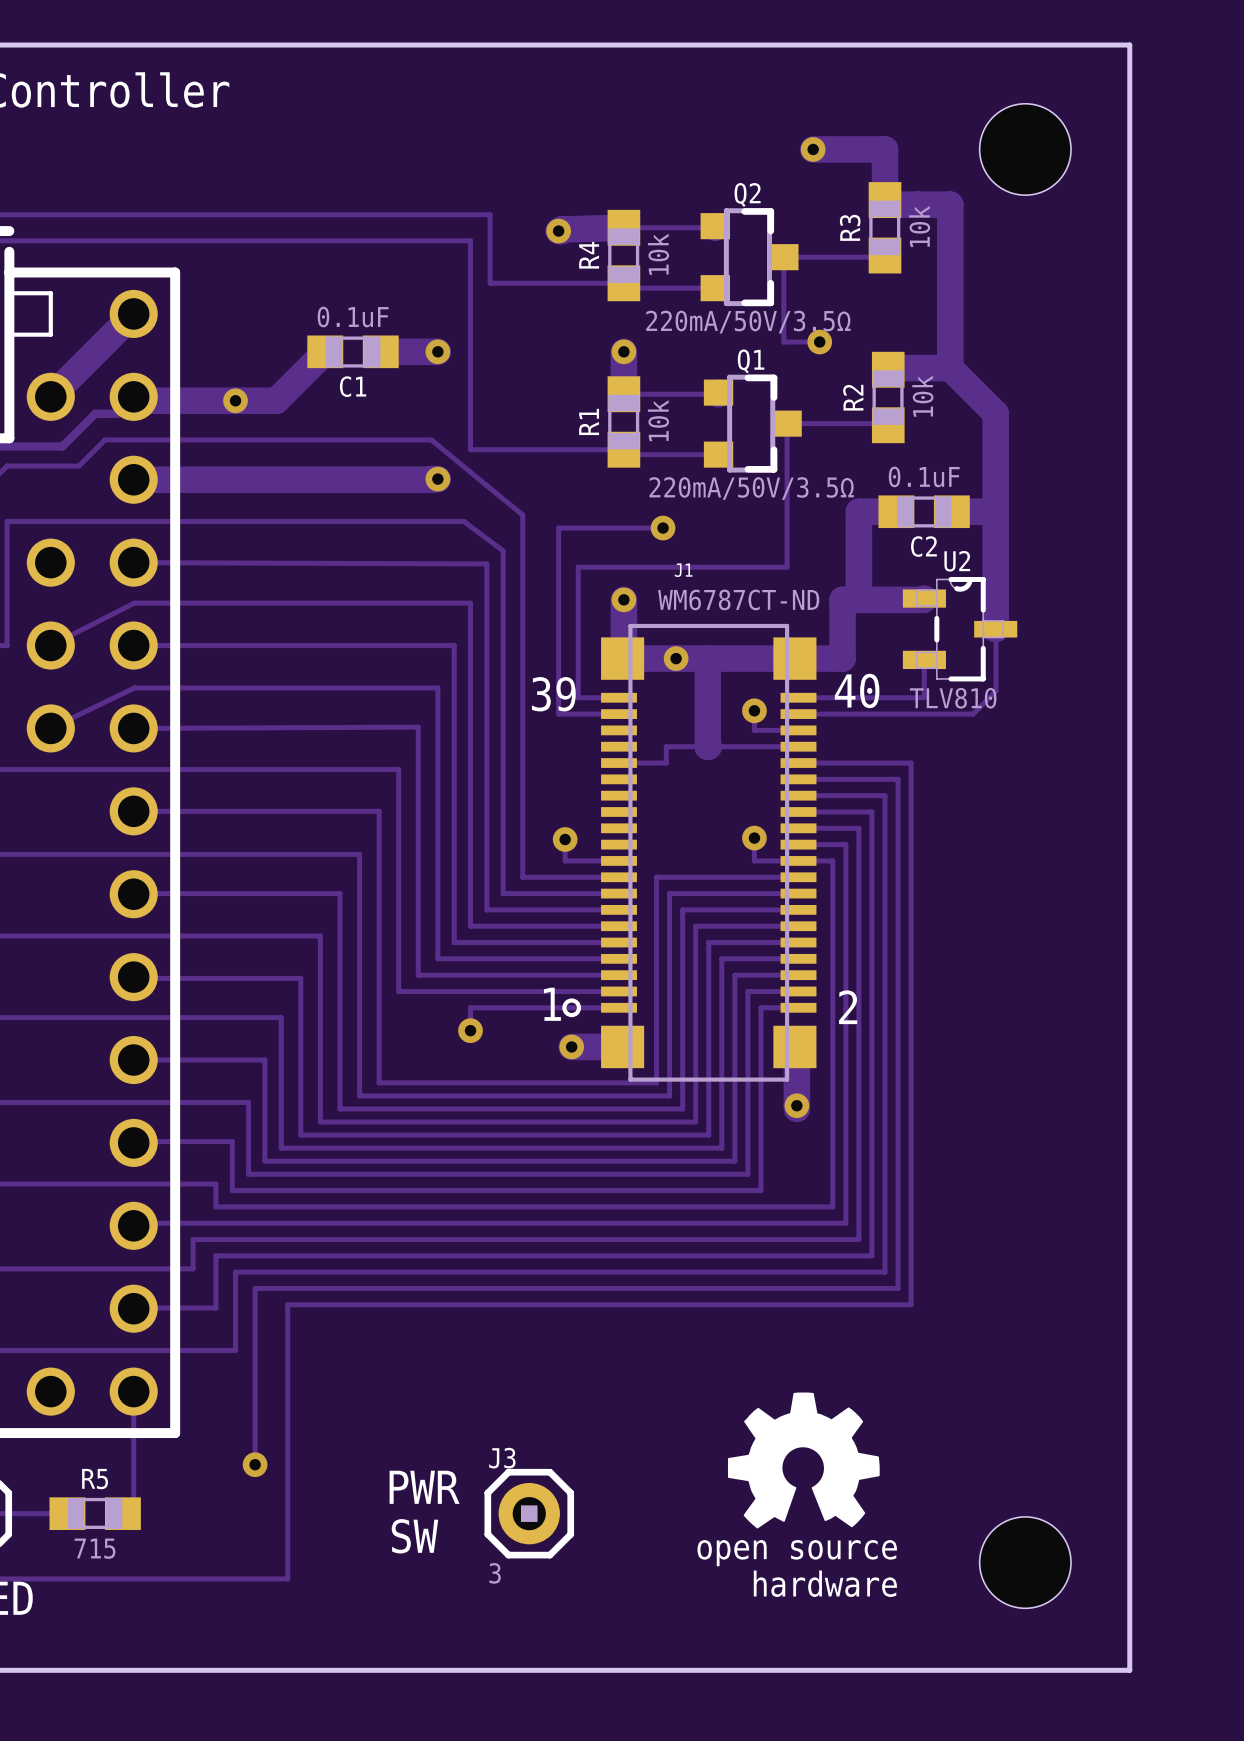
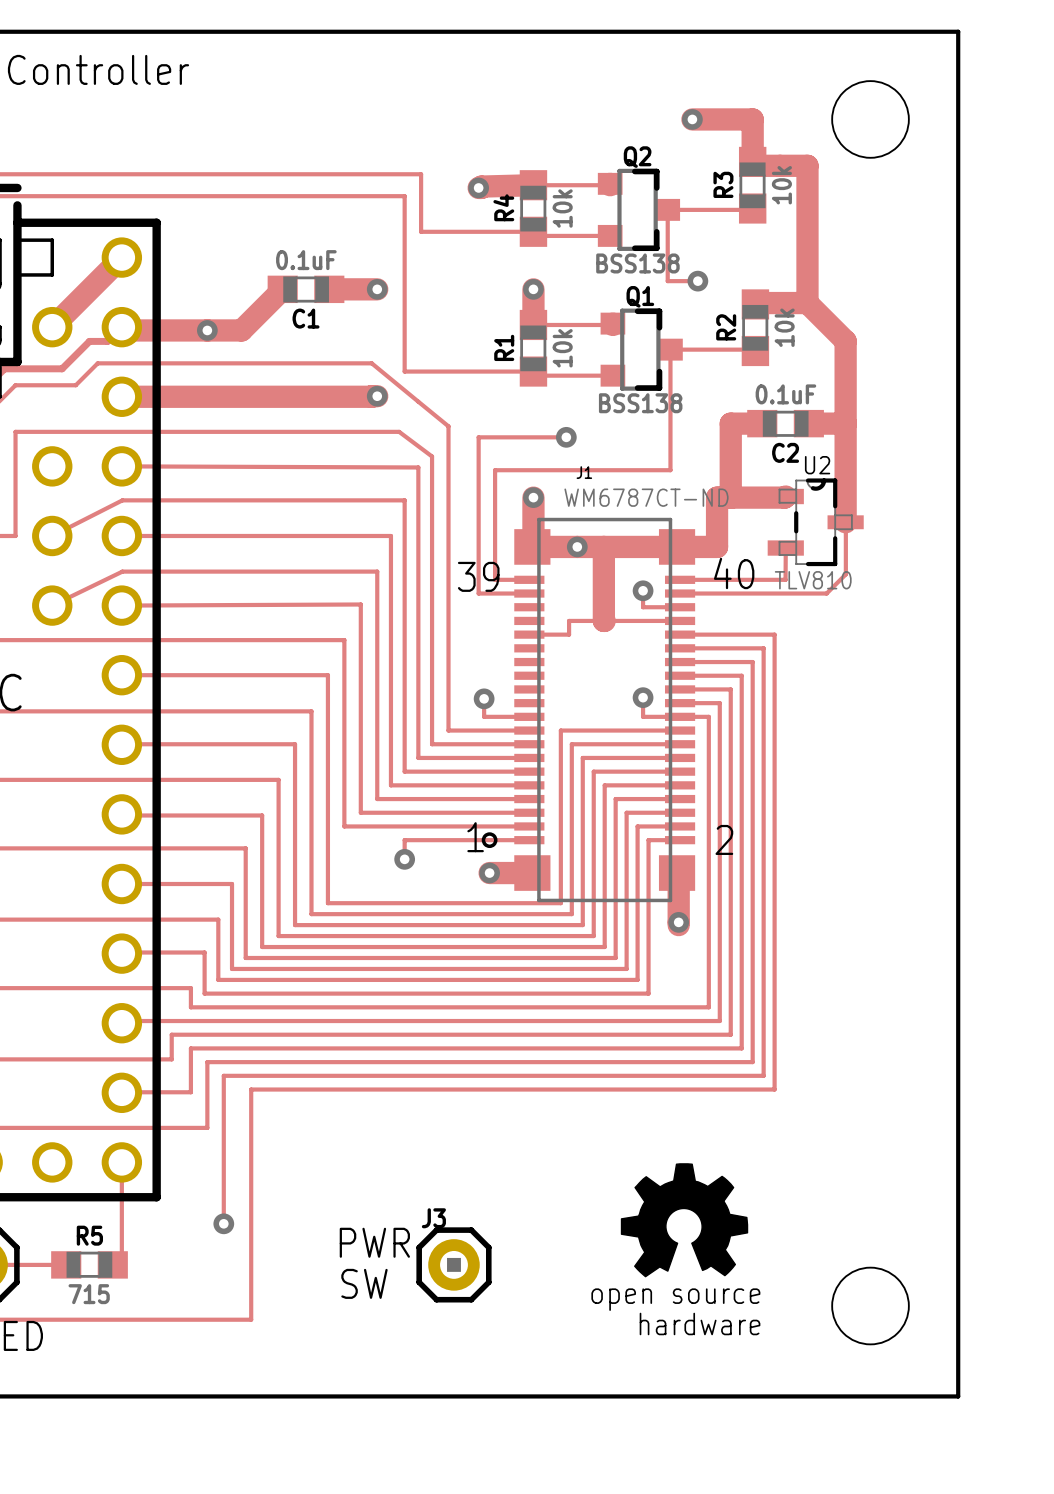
Q2 value: 220mA/50V/3.5Ω (748, 322) -> BSS138 (637, 263)
Q1 value: 220mA/50V/3.5Ω (751, 488) -> BSS138 (640, 403)
J3 value: 3 (495, 1573) -> none

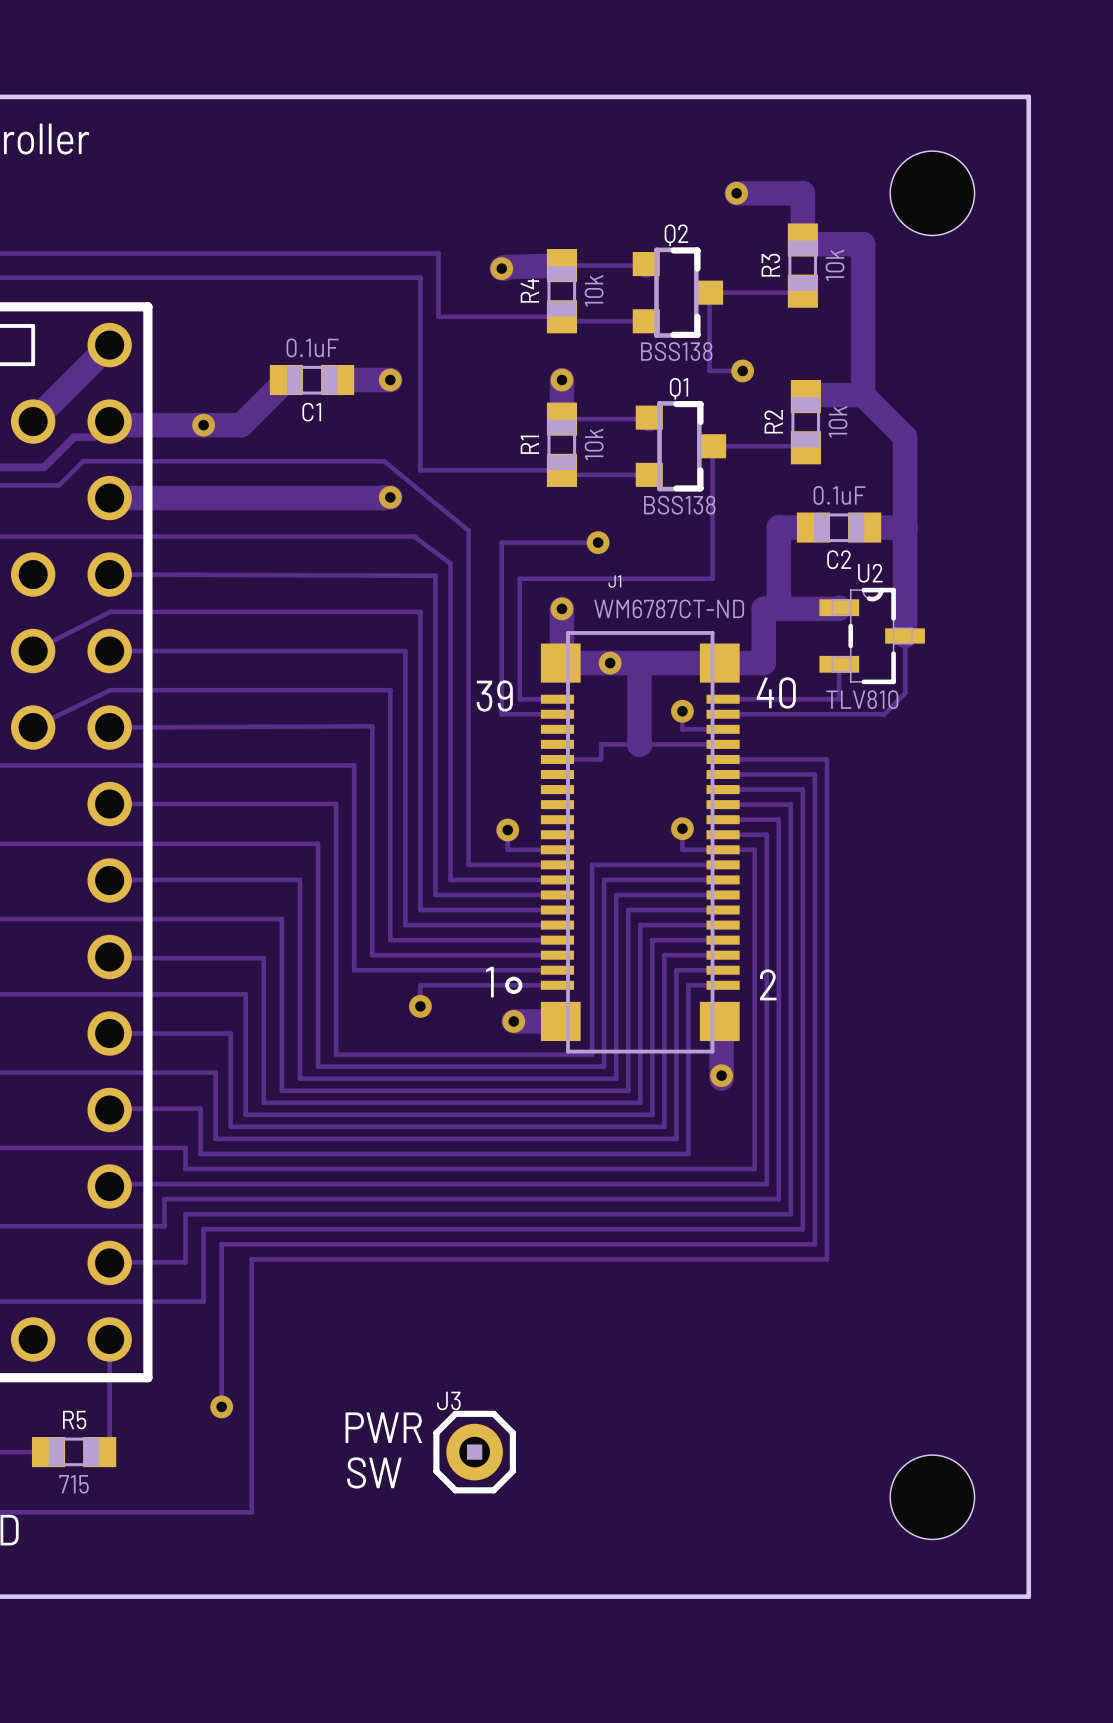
drawing: [620, 1163, 749, 1278] -> none

